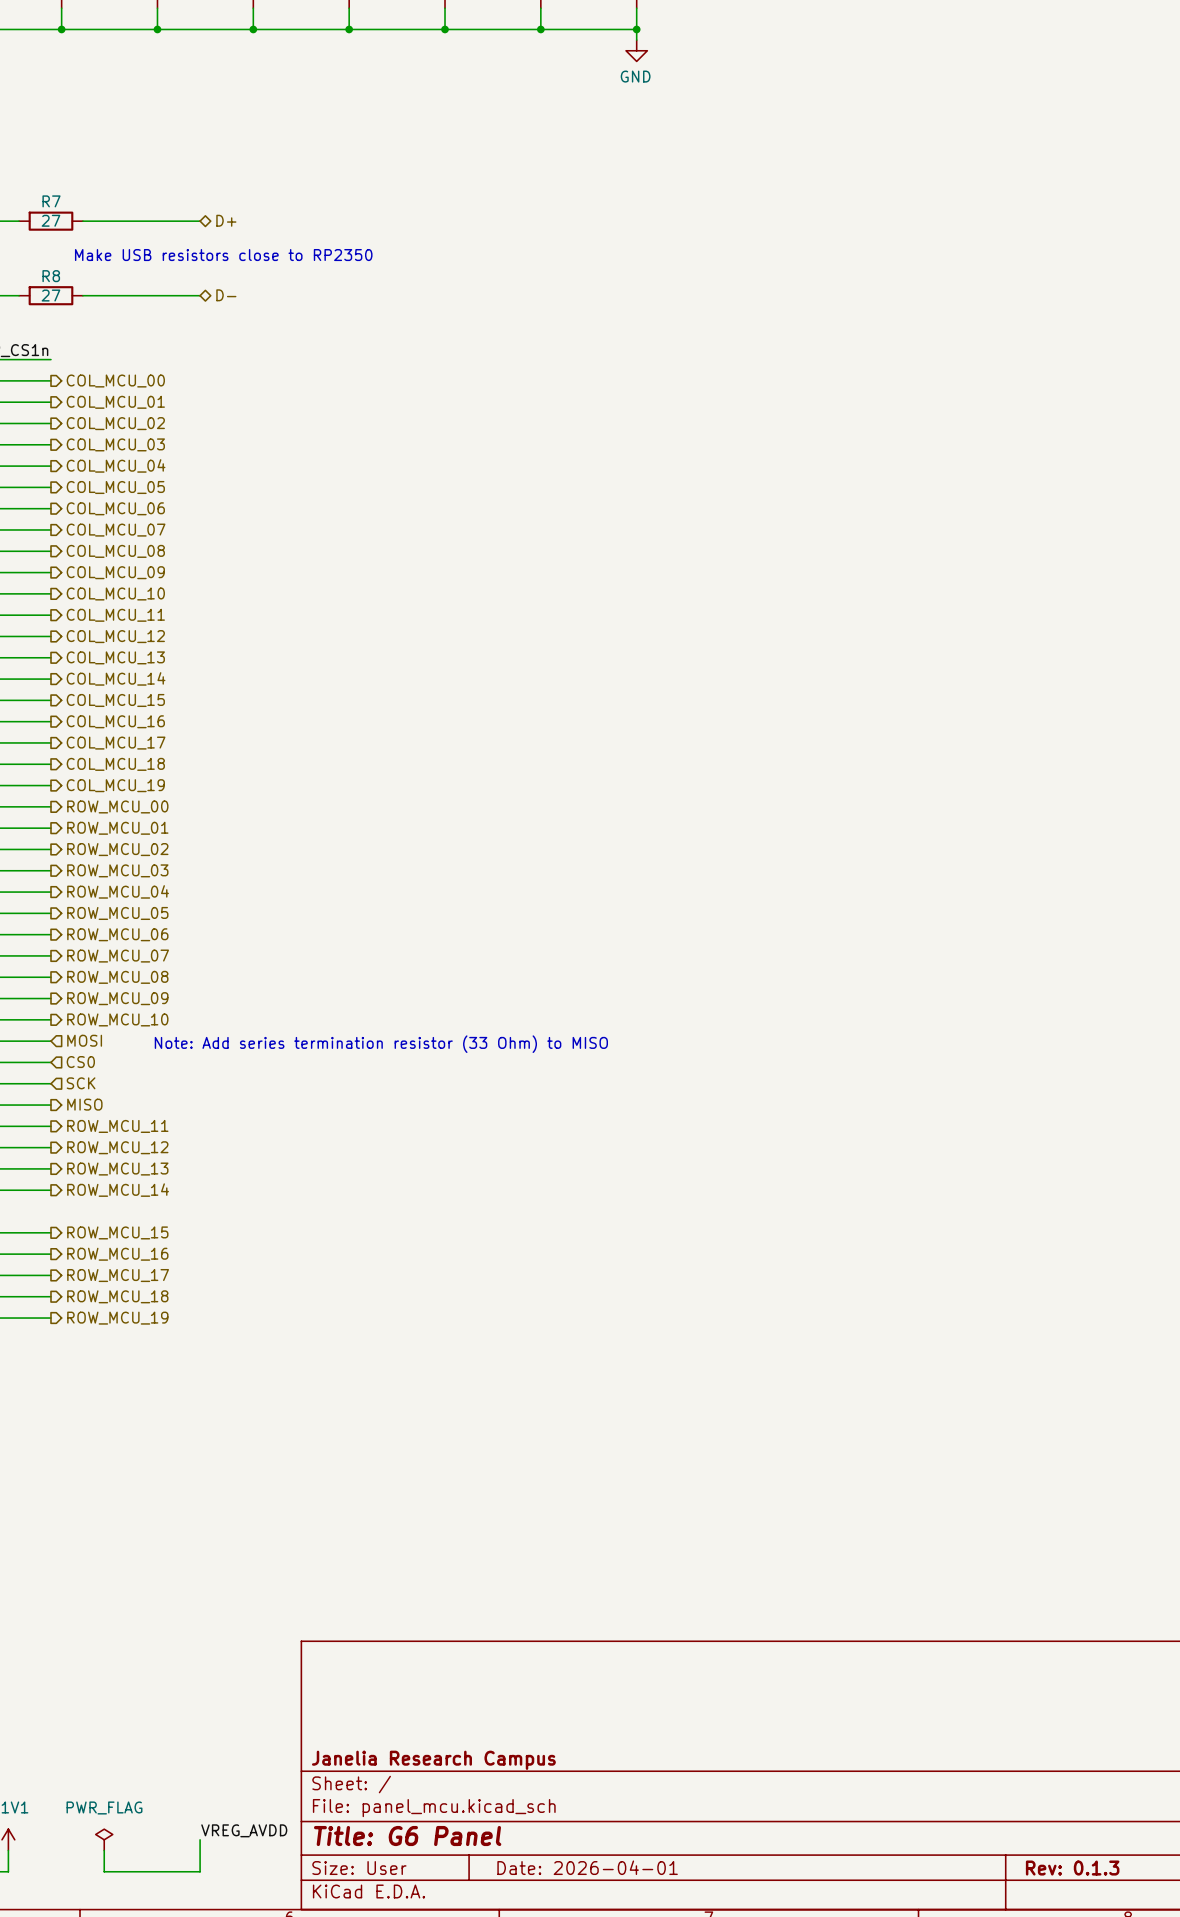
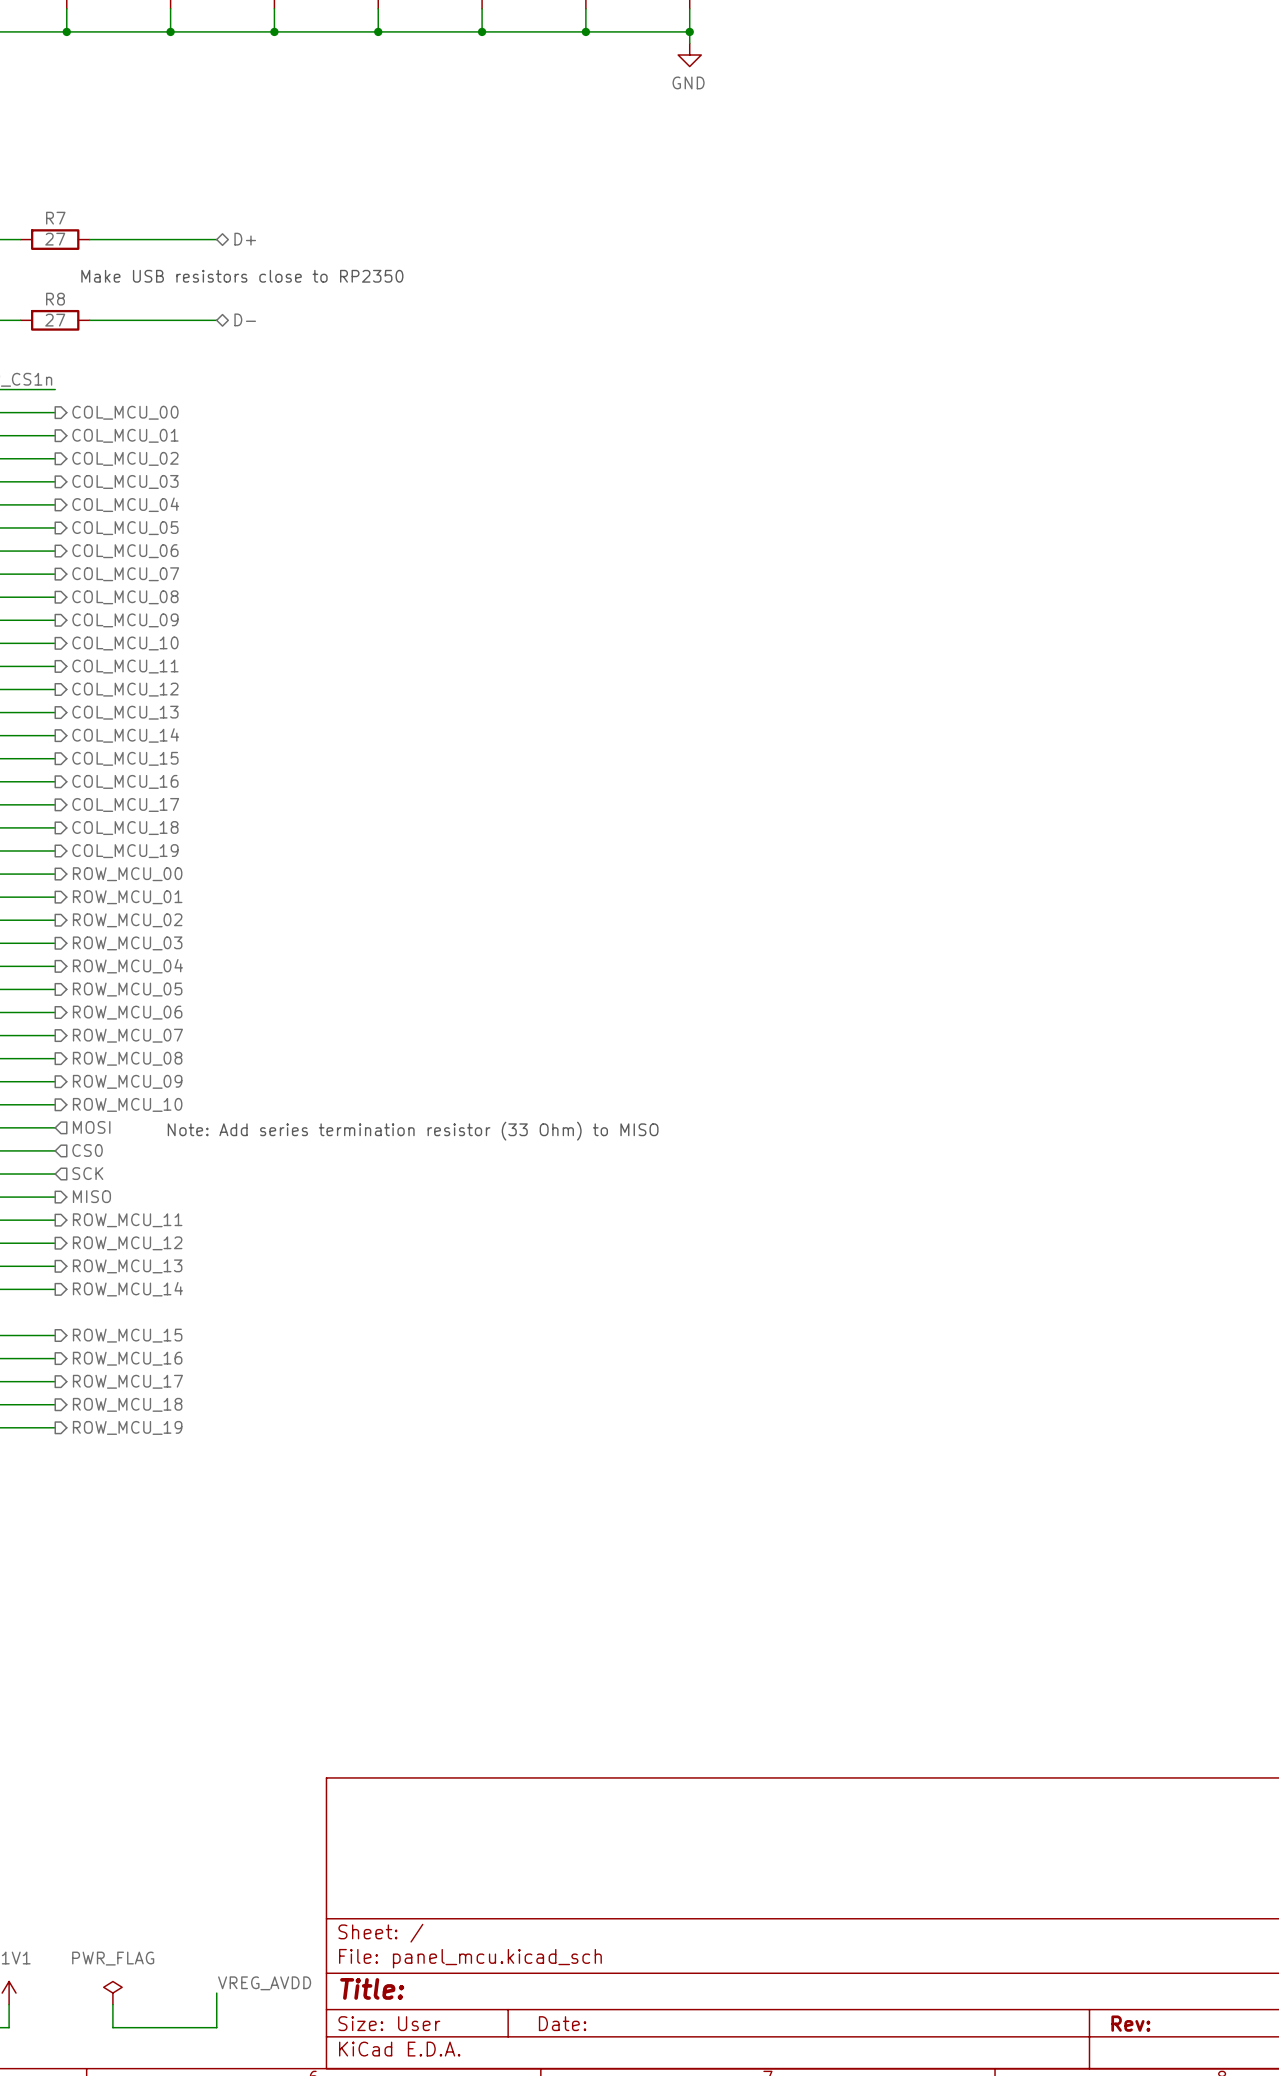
title block: Janelia Research Campus (433, 1760) -> none
title block: Title: G6 Panel (407, 1836) -> Title: (372, 1988)
title block: Date: 2026-04-01 (587, 1867) -> Date: (562, 2023)
title block: Rev: 0.1.3 (1072, 1868) -> Rev: (1130, 2023)

